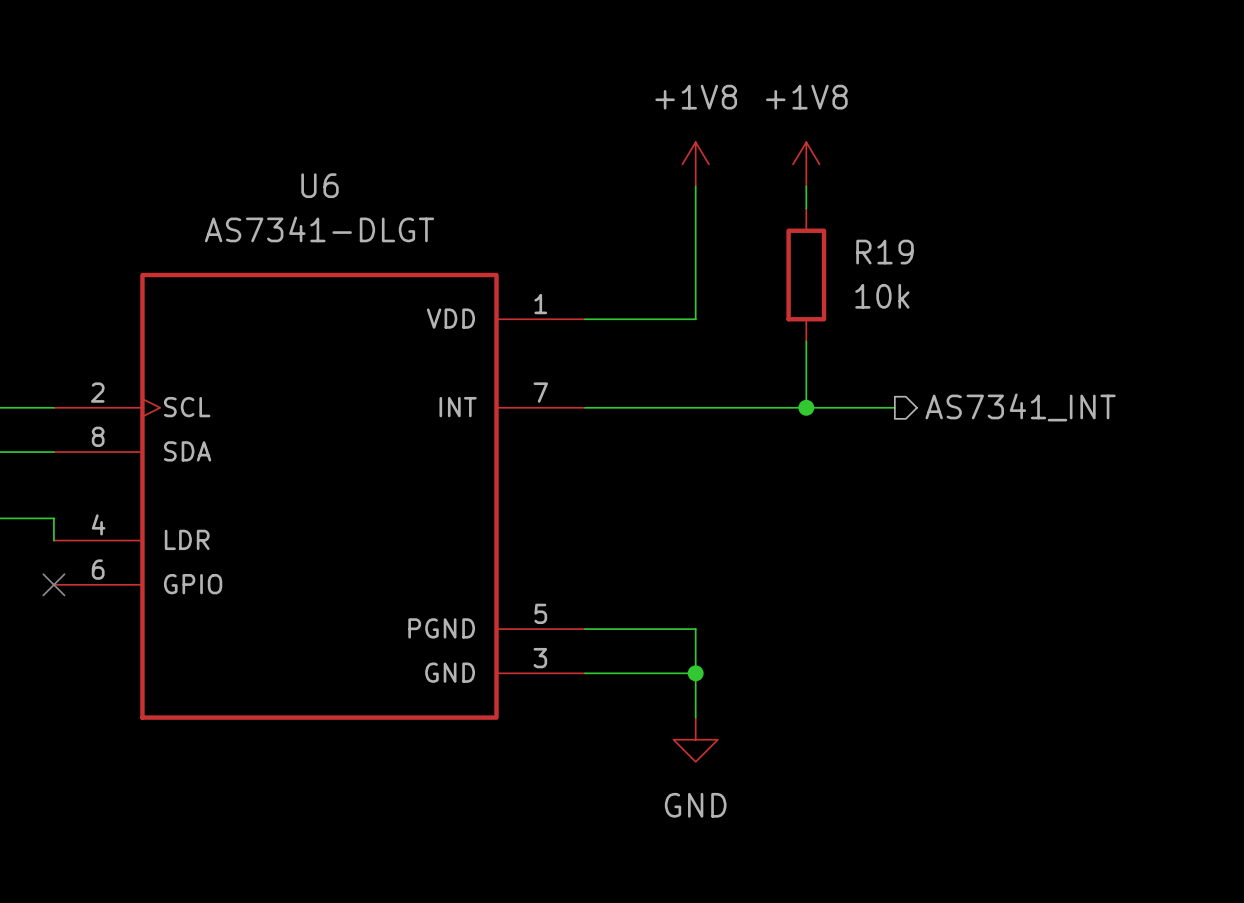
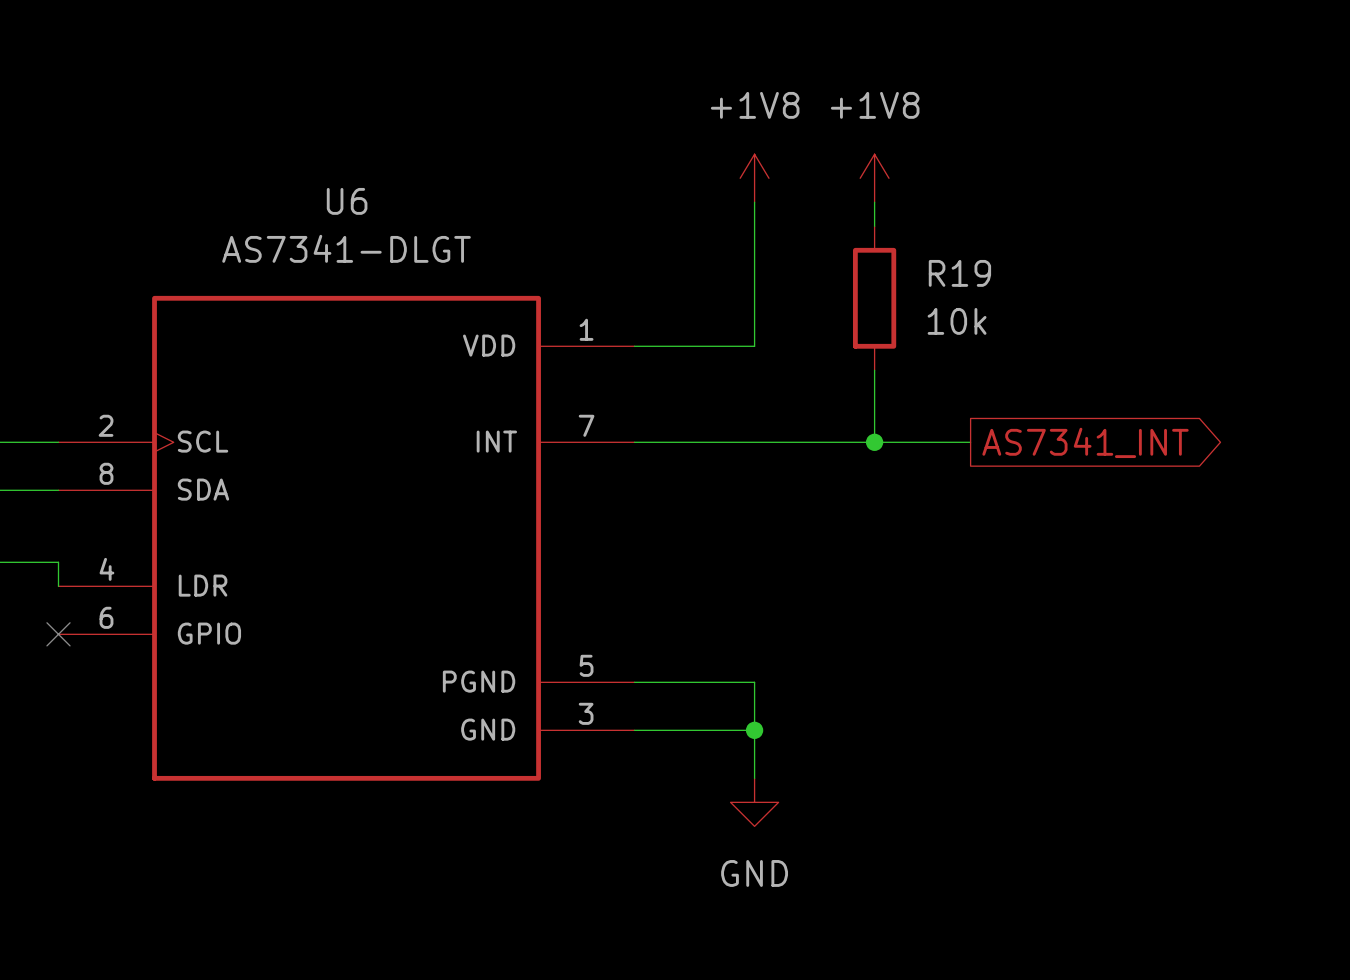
hierarchical label: AS7341_INT (1020, 407) -> none
global label: none -> AS7341_INT (1085, 442)

